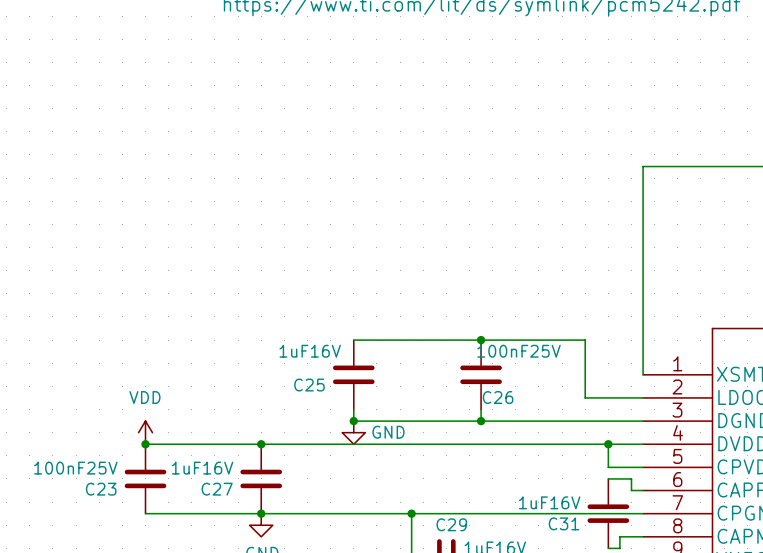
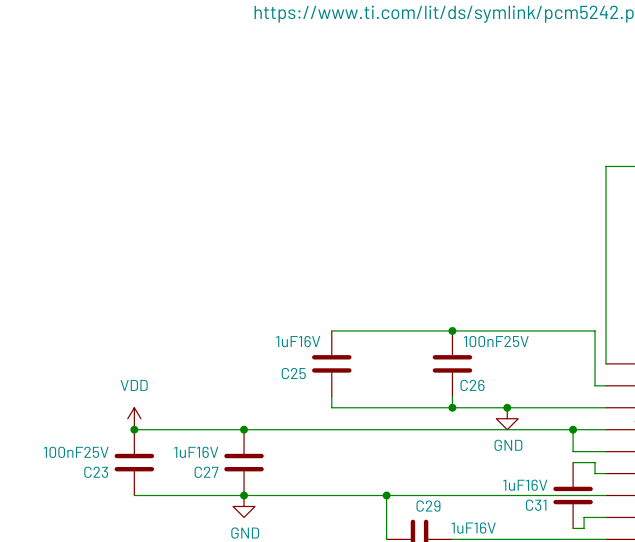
wire: (585, 340) (585, 397) (631, 397) -> (551, 330) (595, 330) (595, 385)
junction: (353, 421) -> none
junction: none -> (507, 407)
power symbol position: GND (353, 432) -> GND (507, 418)
power symbol text position: GND (388, 432) -> GND (508, 445)

